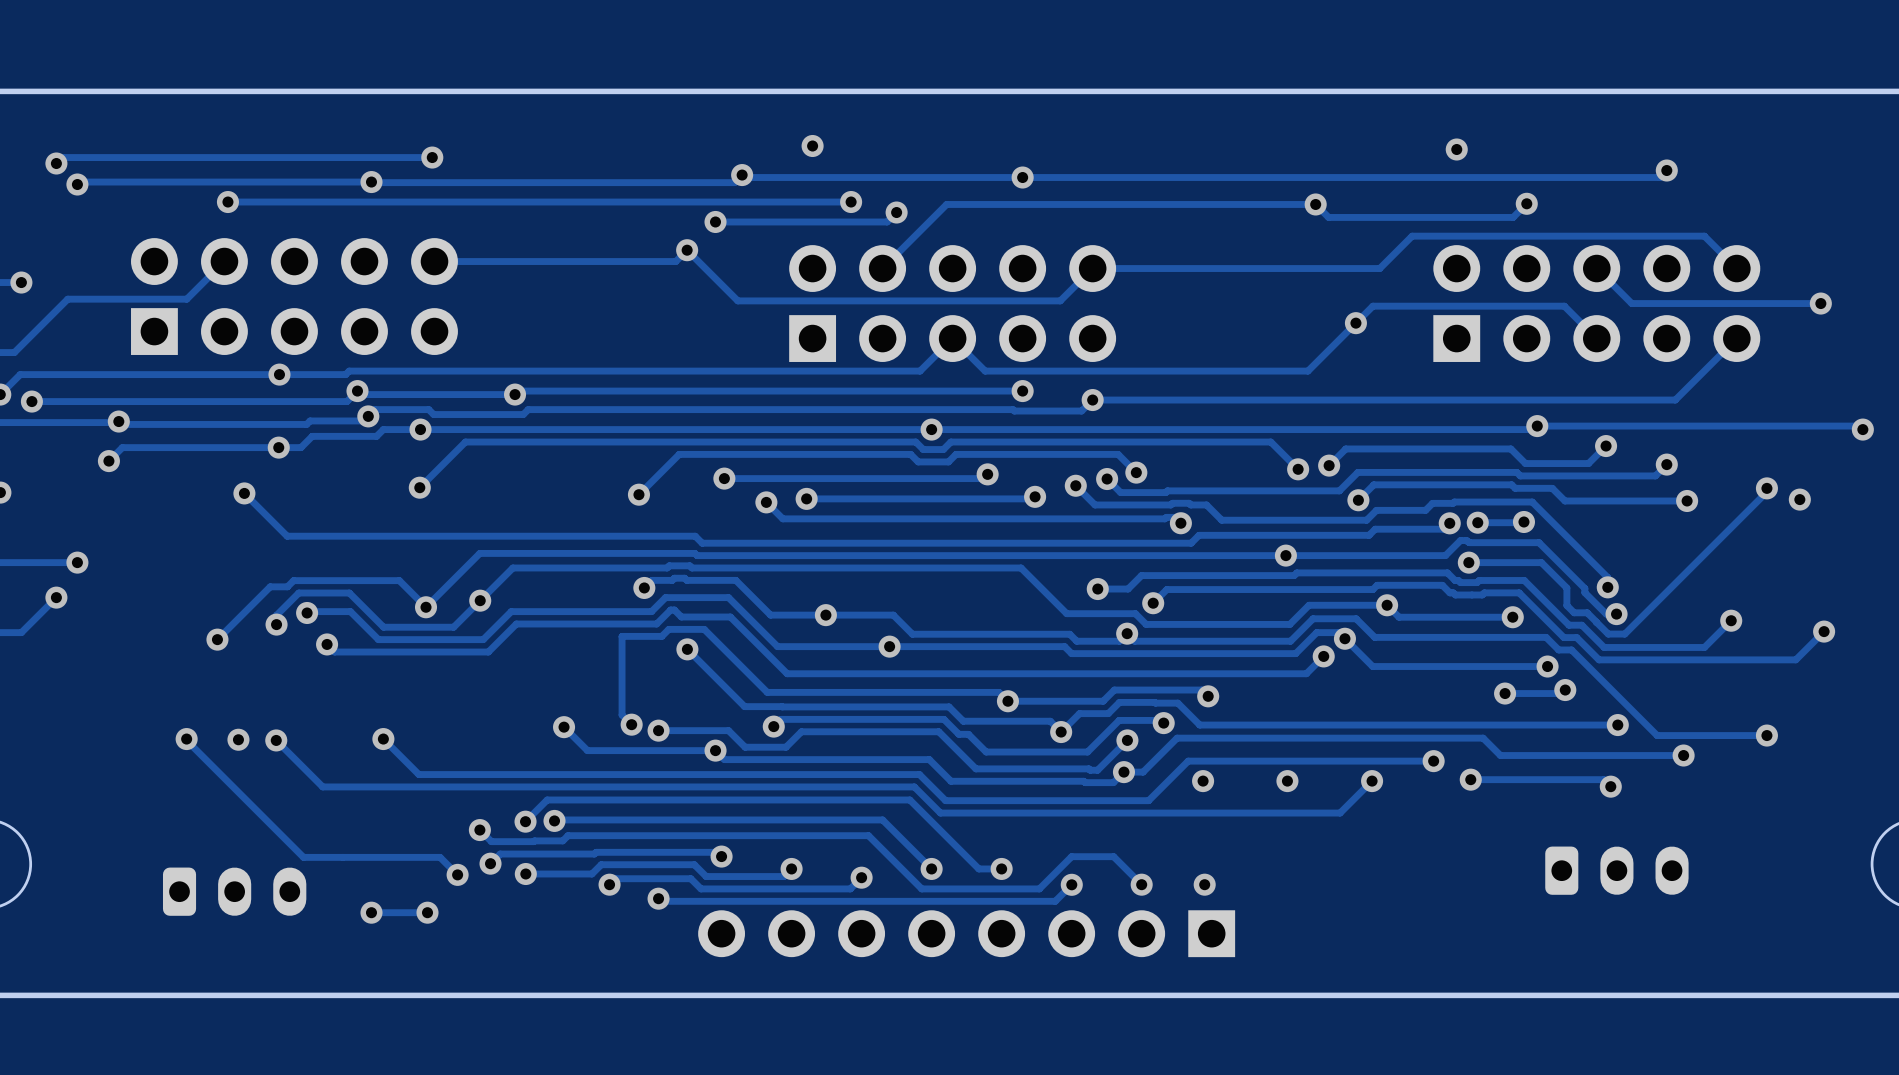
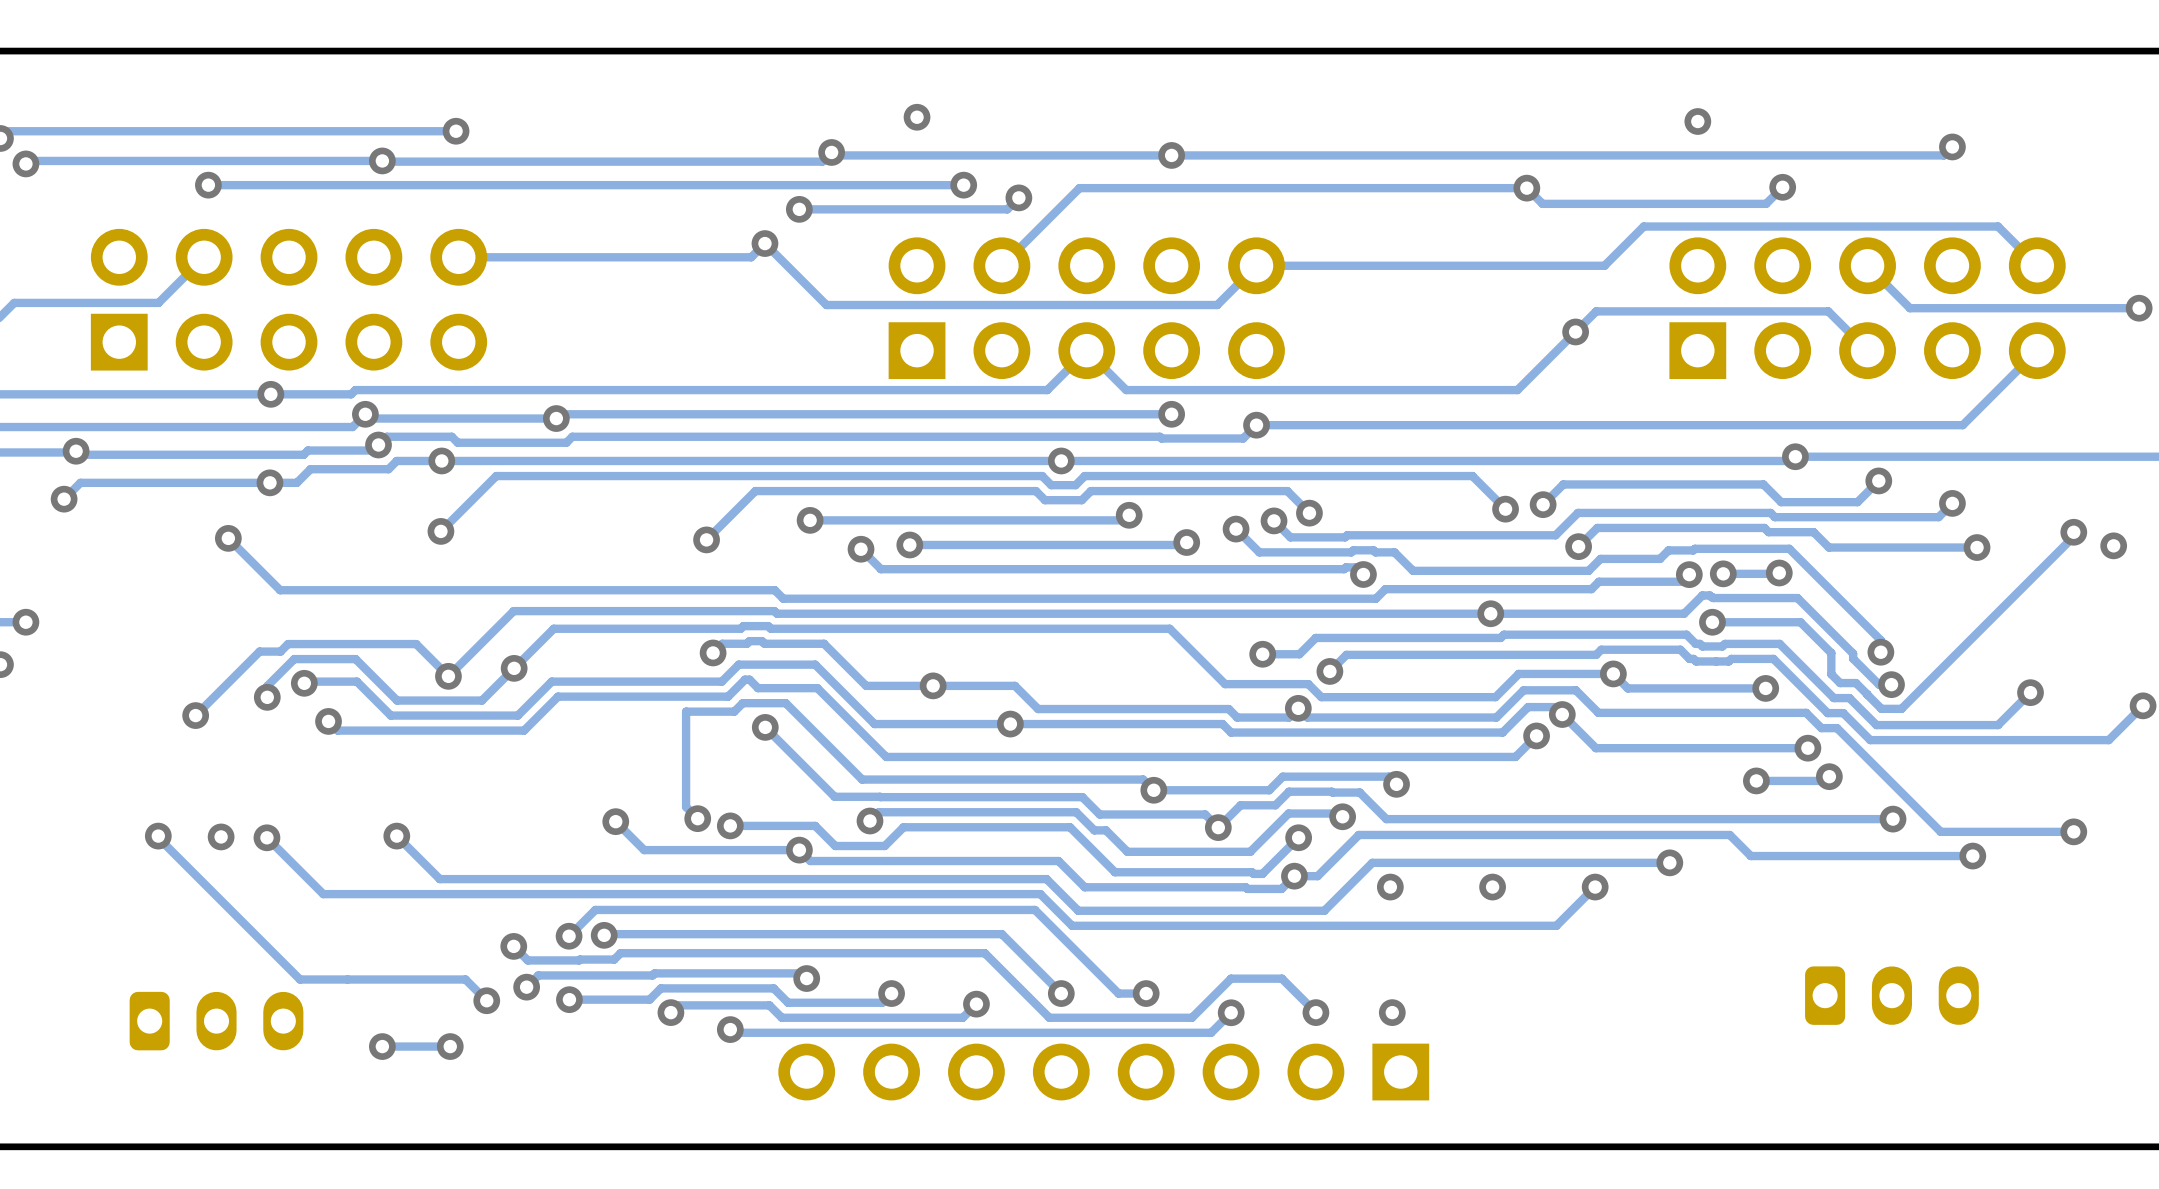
track: (1470, 779) (1603, 779) (1610, 786) -> none
via: (1470, 779) -> none
via: (1610, 786) -> none

